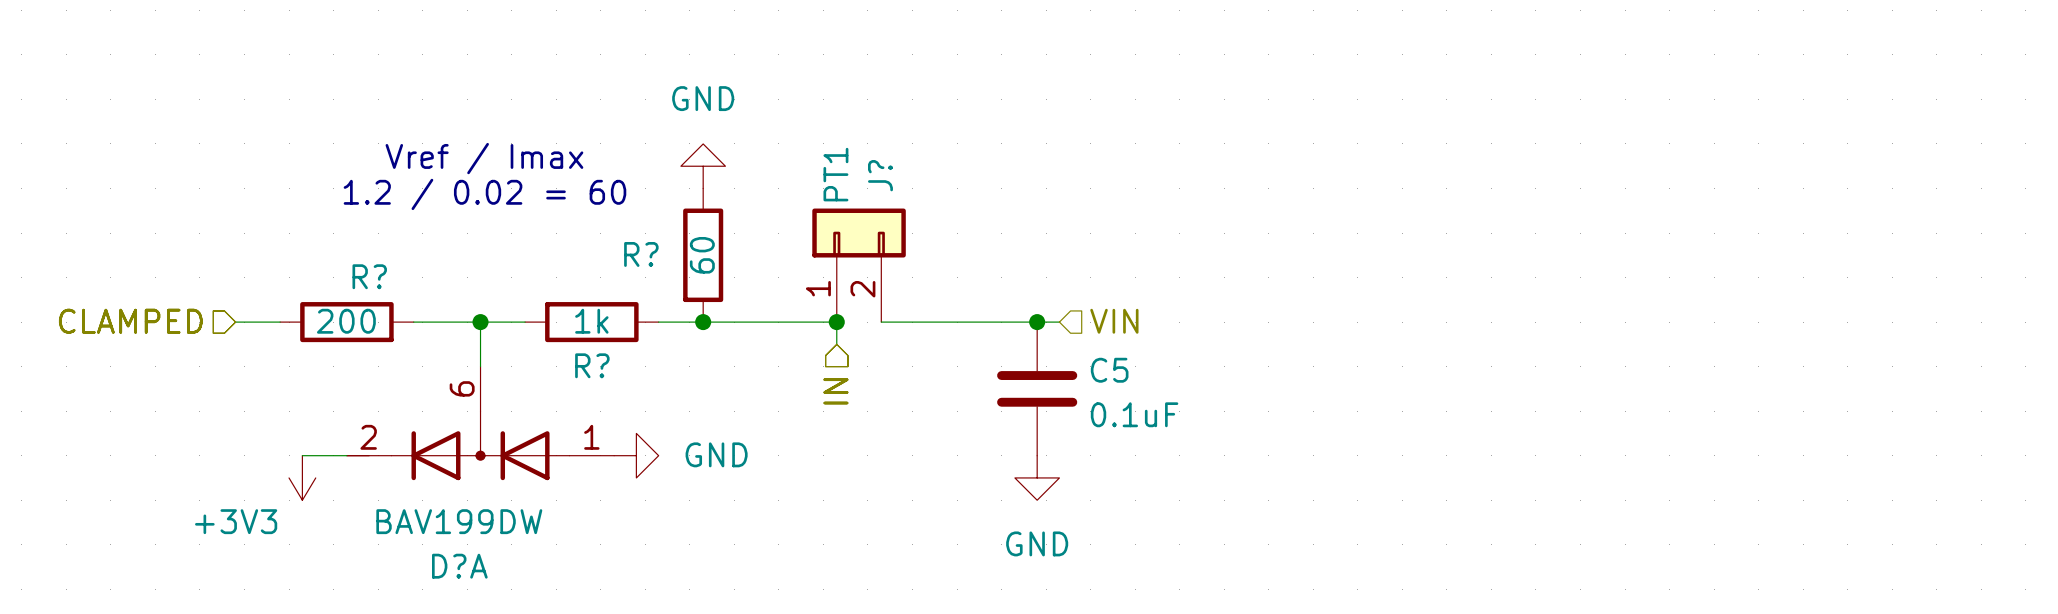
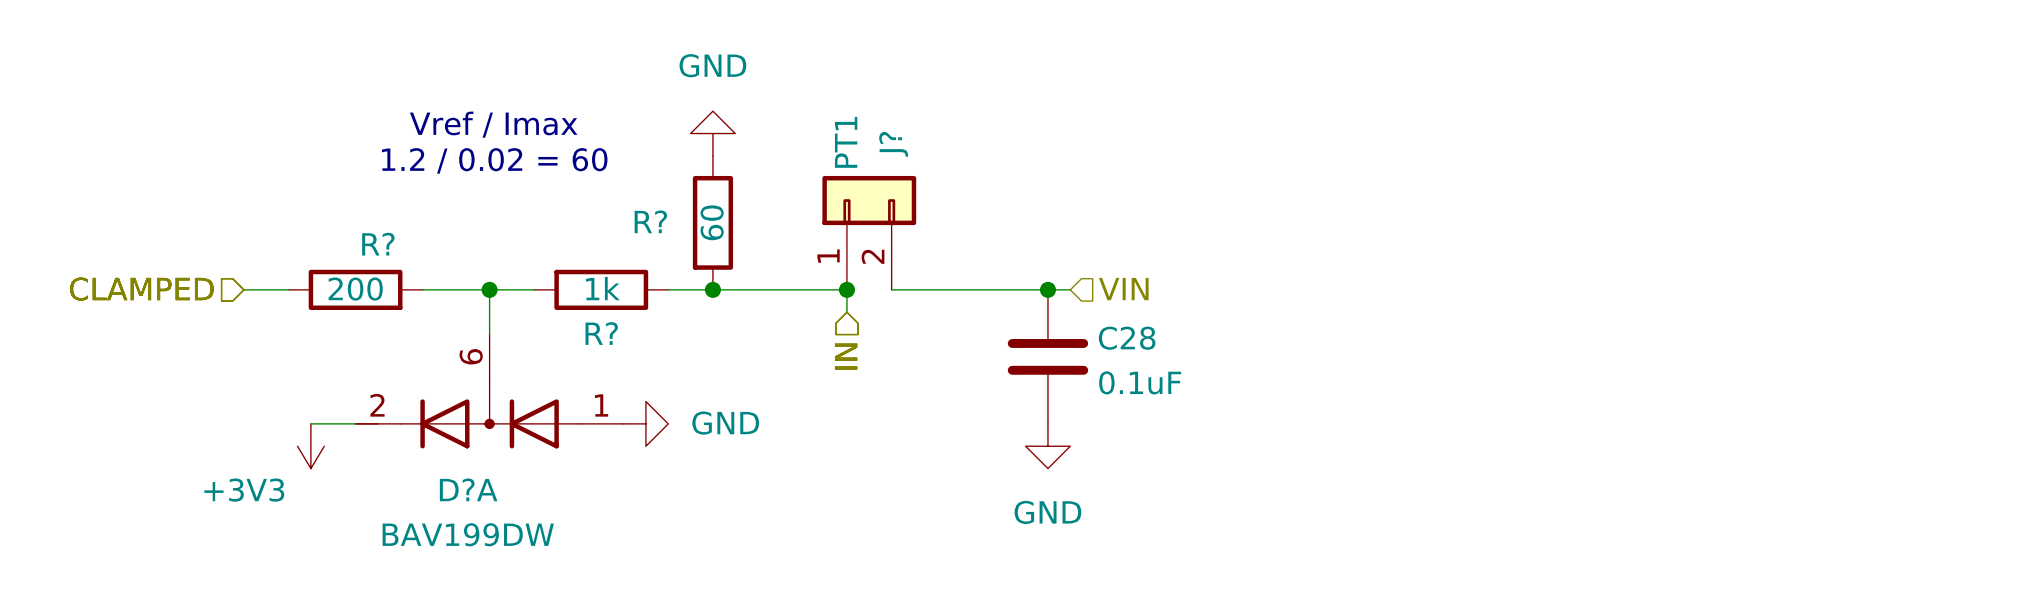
C5 name: C5 (1109, 370) -> C28 (1127, 338)
D?A value position: BAV199DW (459, 521) -> BAV199DW (468, 534)
D?A name position: D?A (459, 566) -> D?A (468, 489)

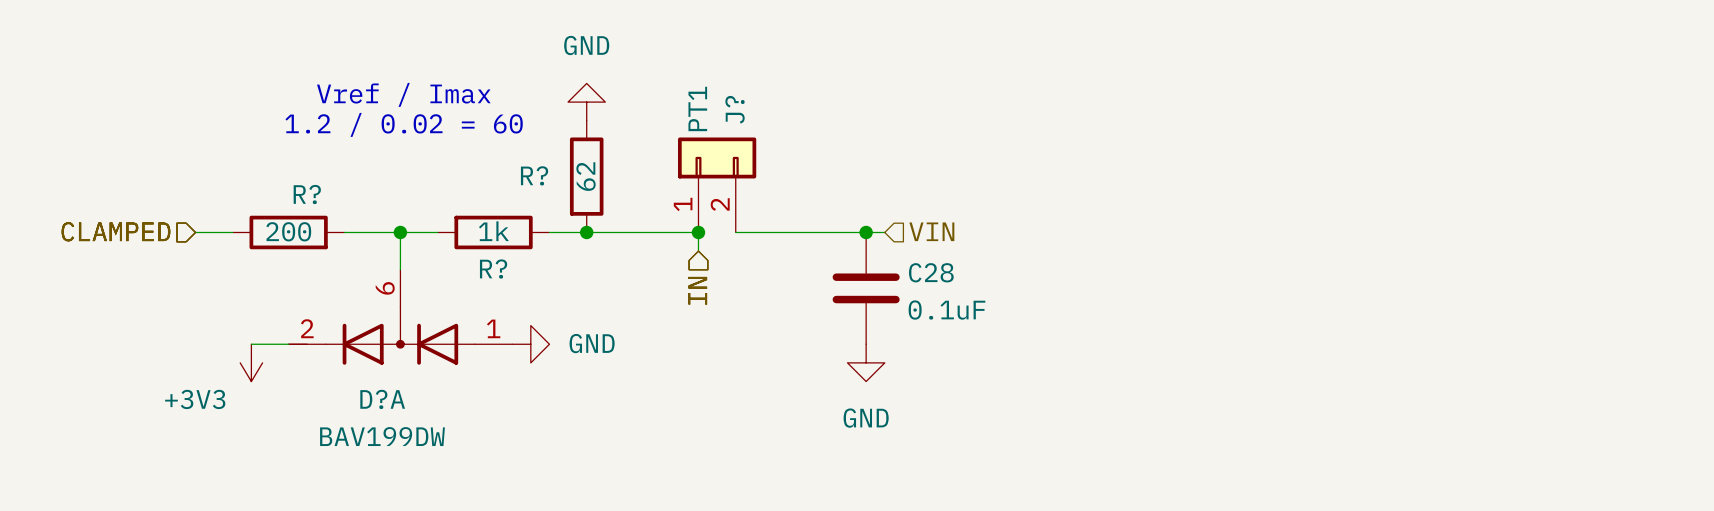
R? value: 60 (712, 222) -> 62 (586, 176)

